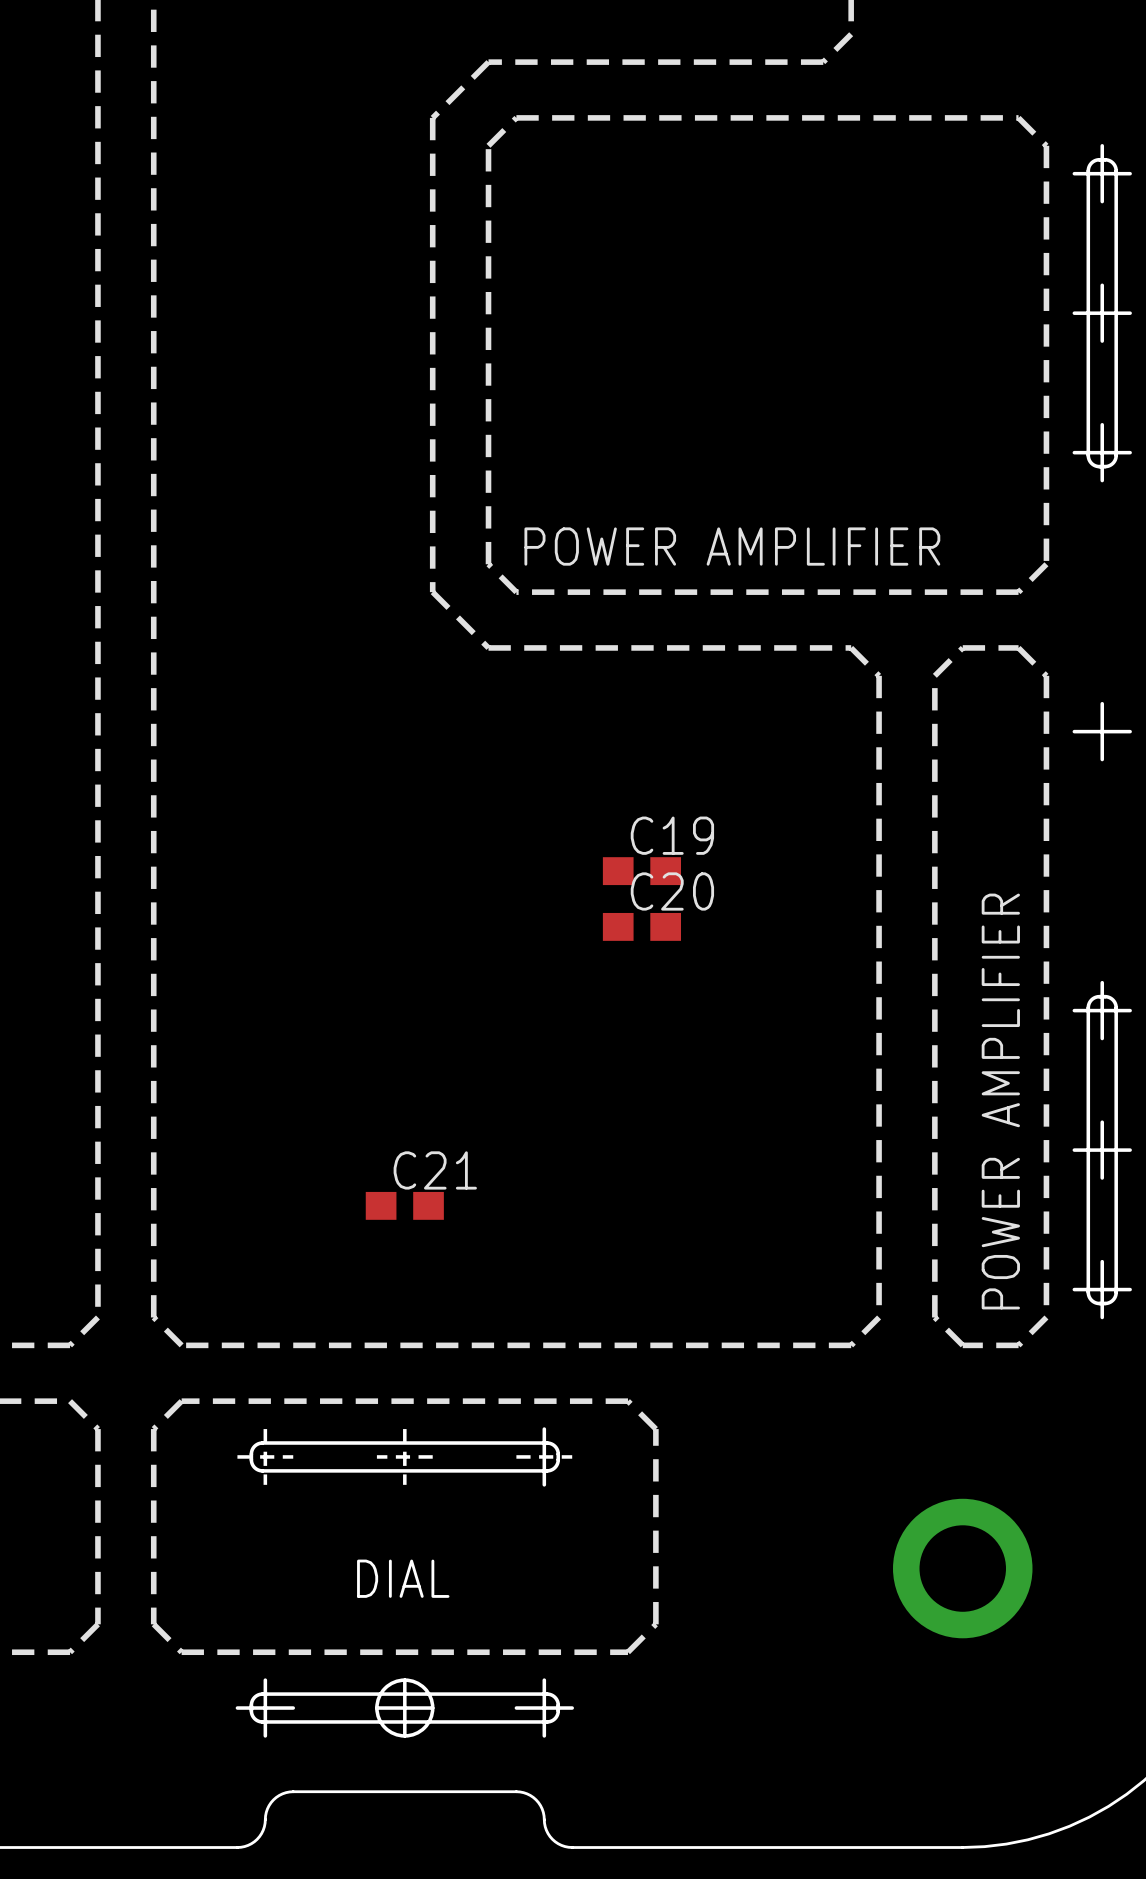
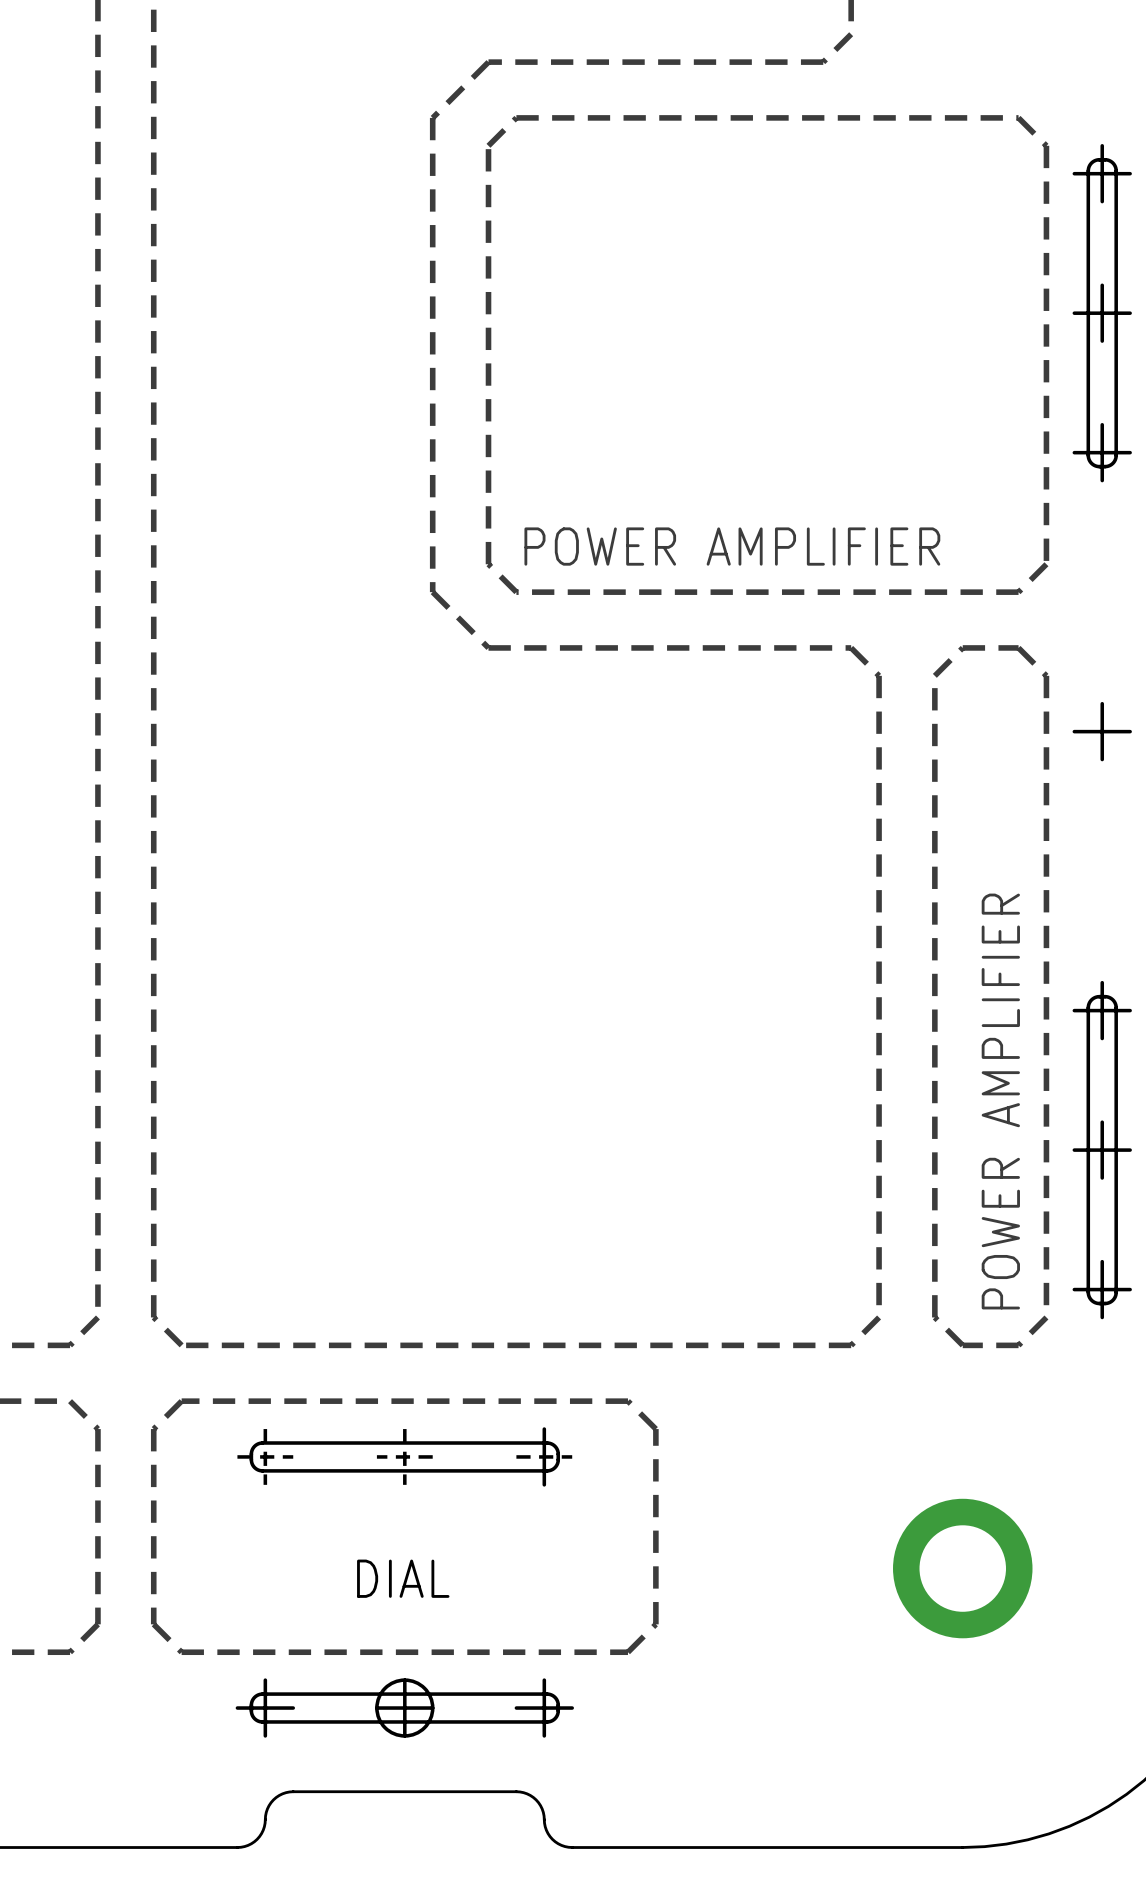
C19: (641, 871) -> none
C20: (641, 926) -> none
C21: (404, 1205) -> none

